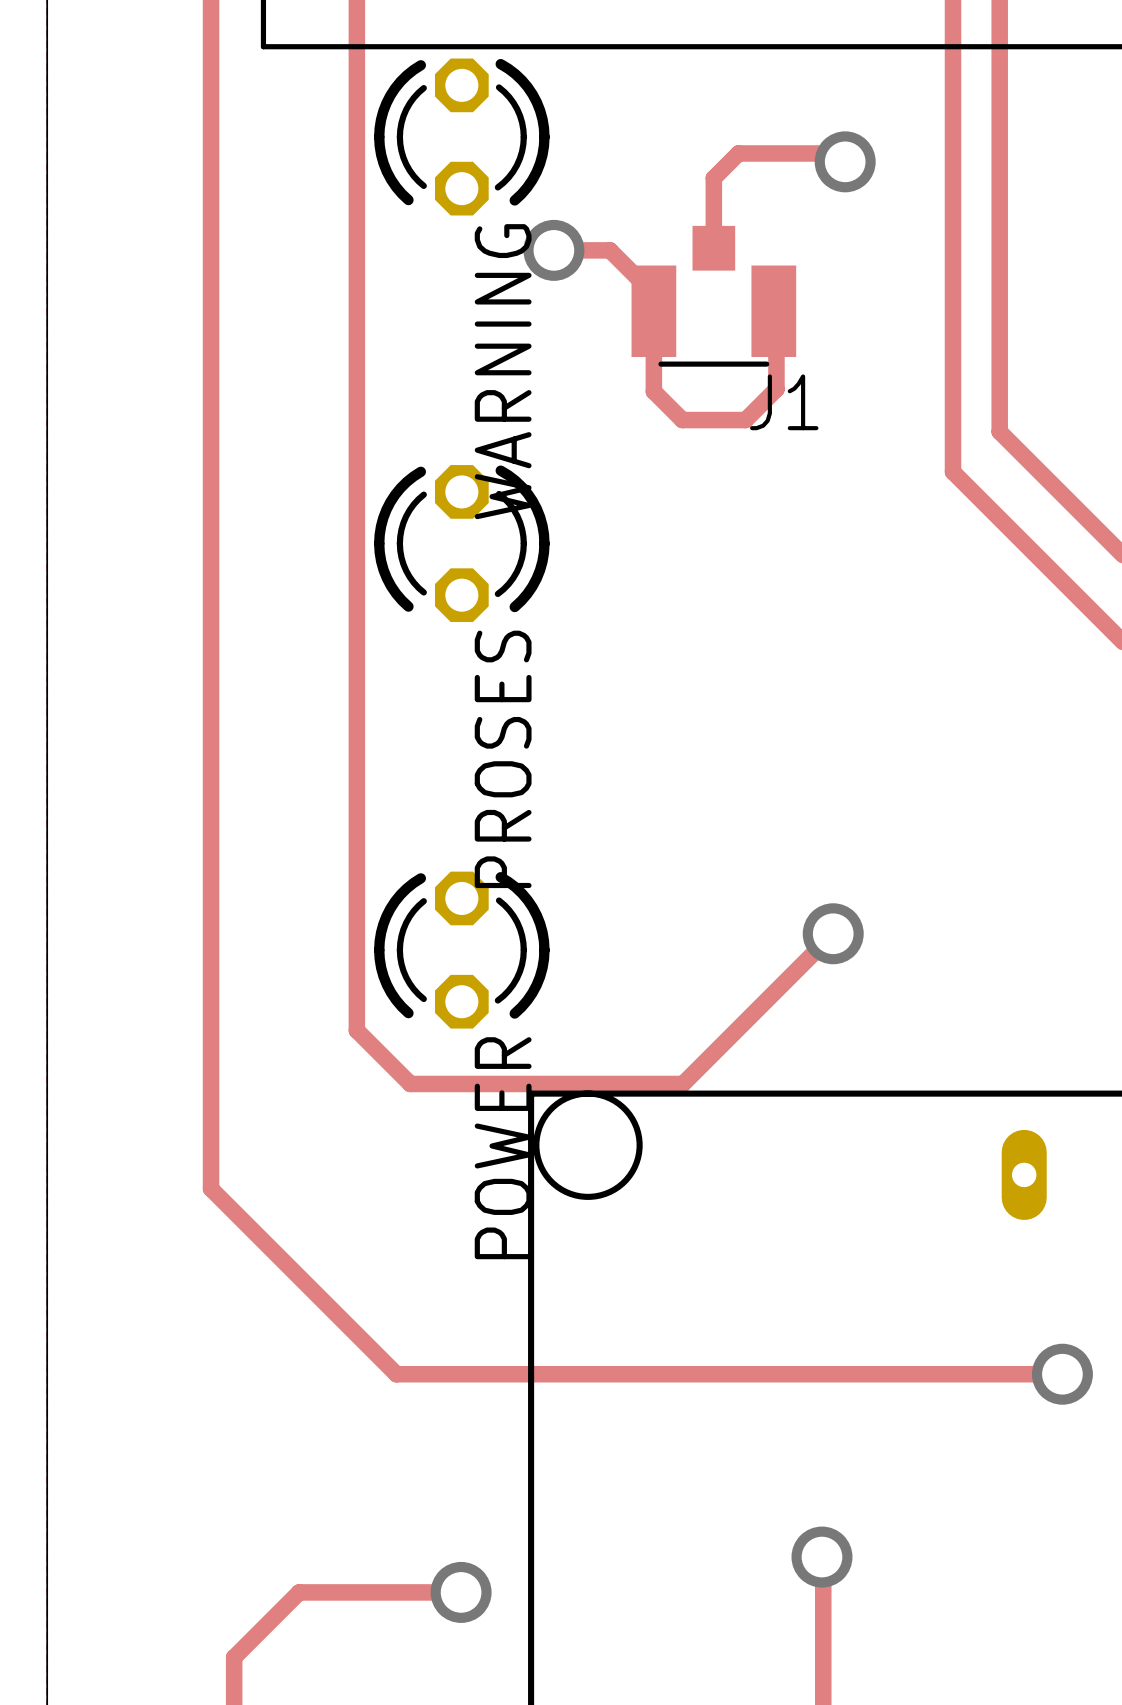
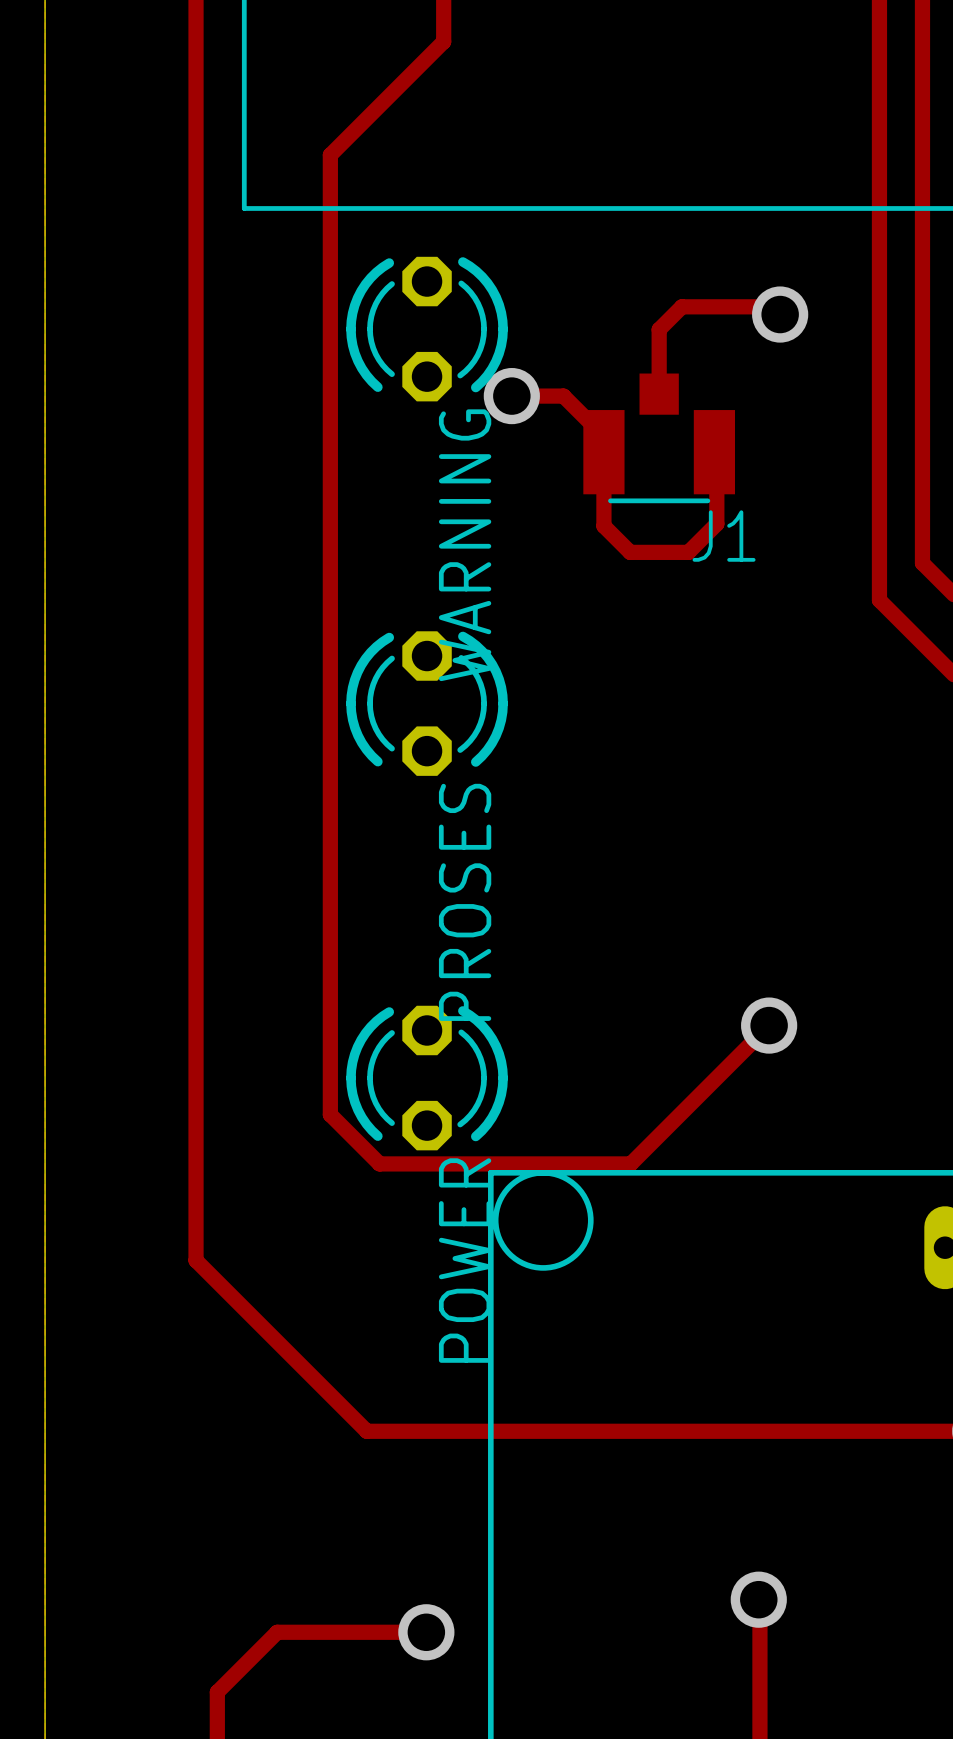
WARNING position: (461, 137) -> (427, 329)
PROSES position: (461, 543) -> (427, 703)
POWER position: (461, 950) -> (427, 1078)

